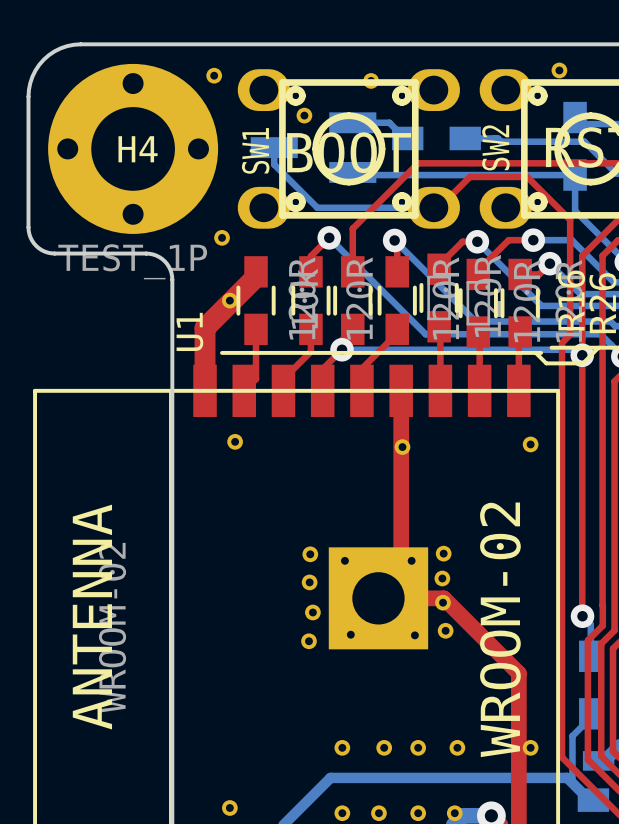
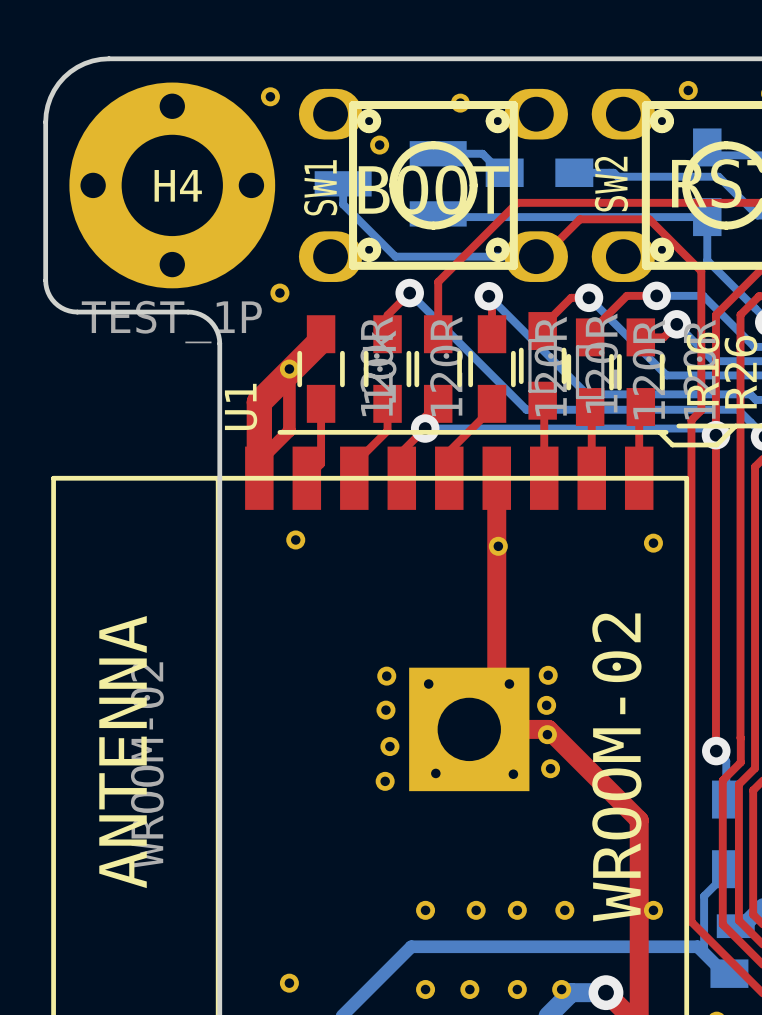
top track: none -> (289, 369) (289, 430) (259, 460) (259, 478)

